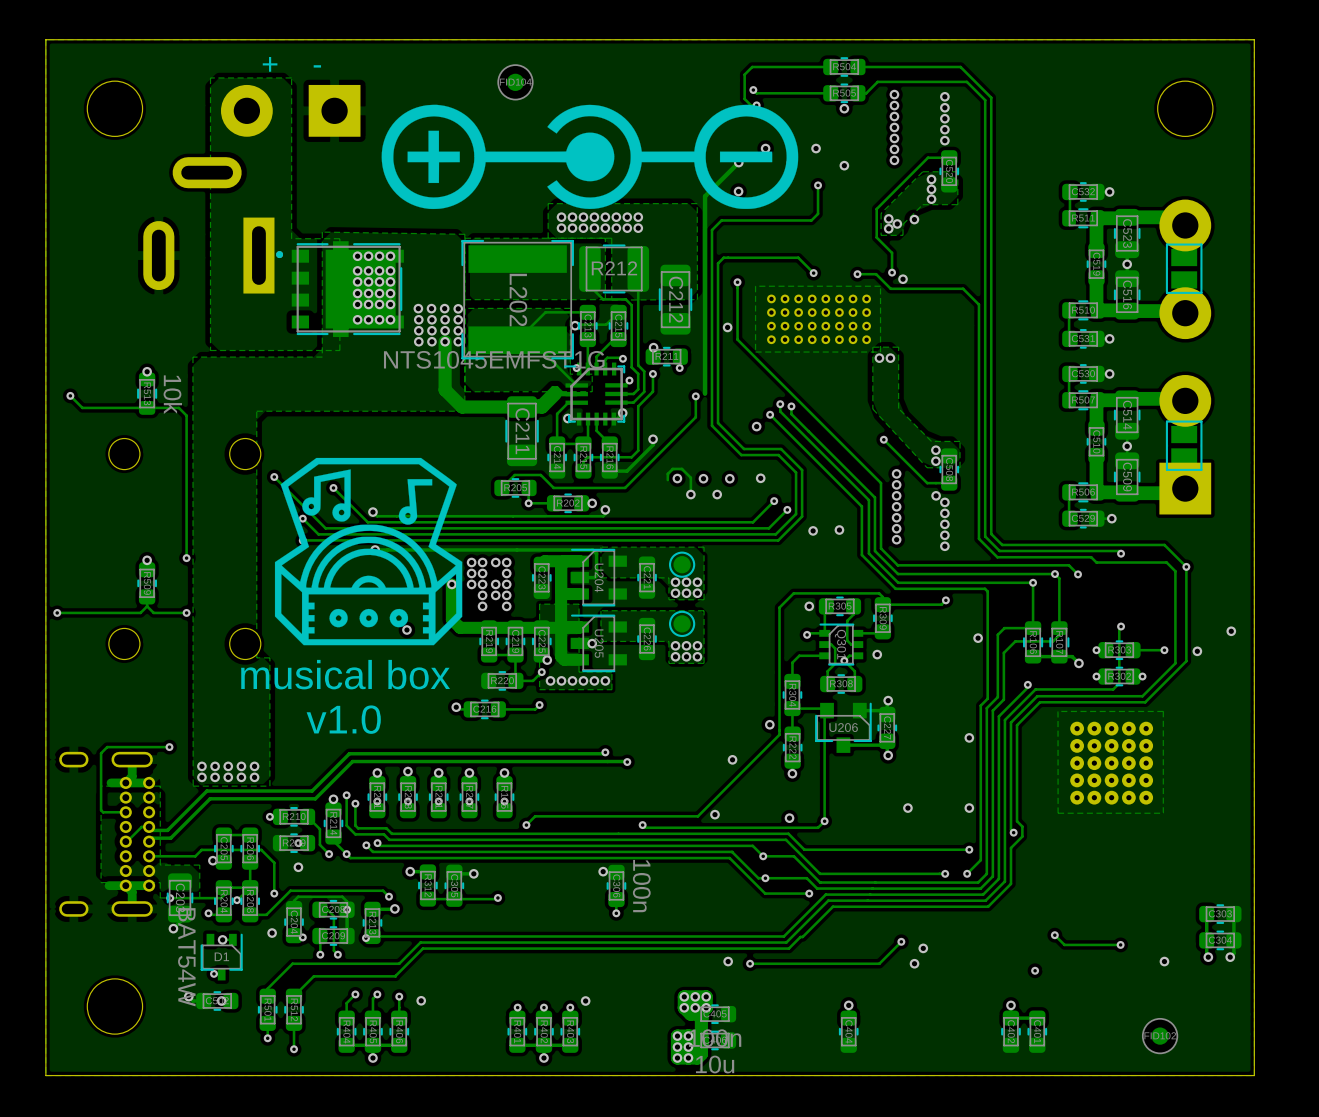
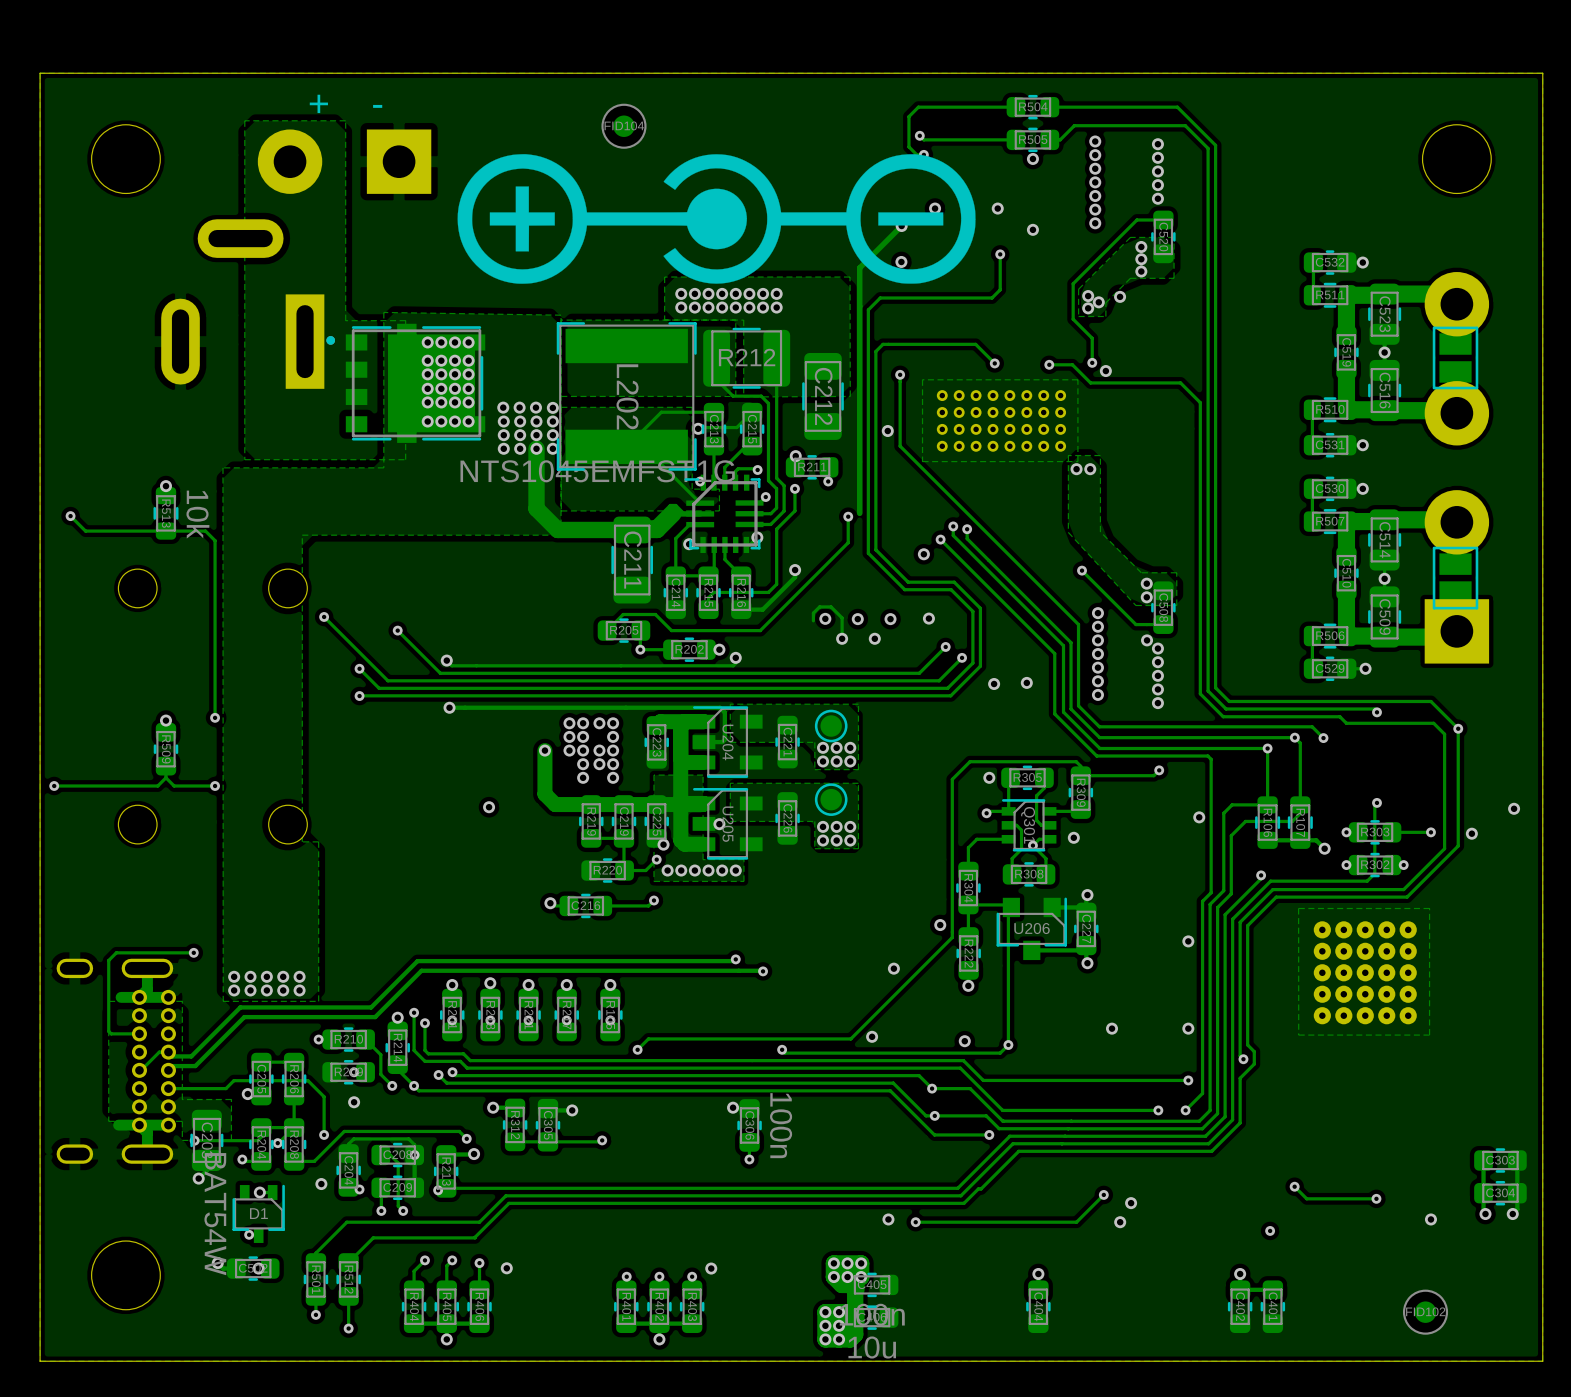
drawing: [274, 457, 463, 646] -> none
text: musical box (345, 674) -> none
text: v1.0 (343, 719) -> none

